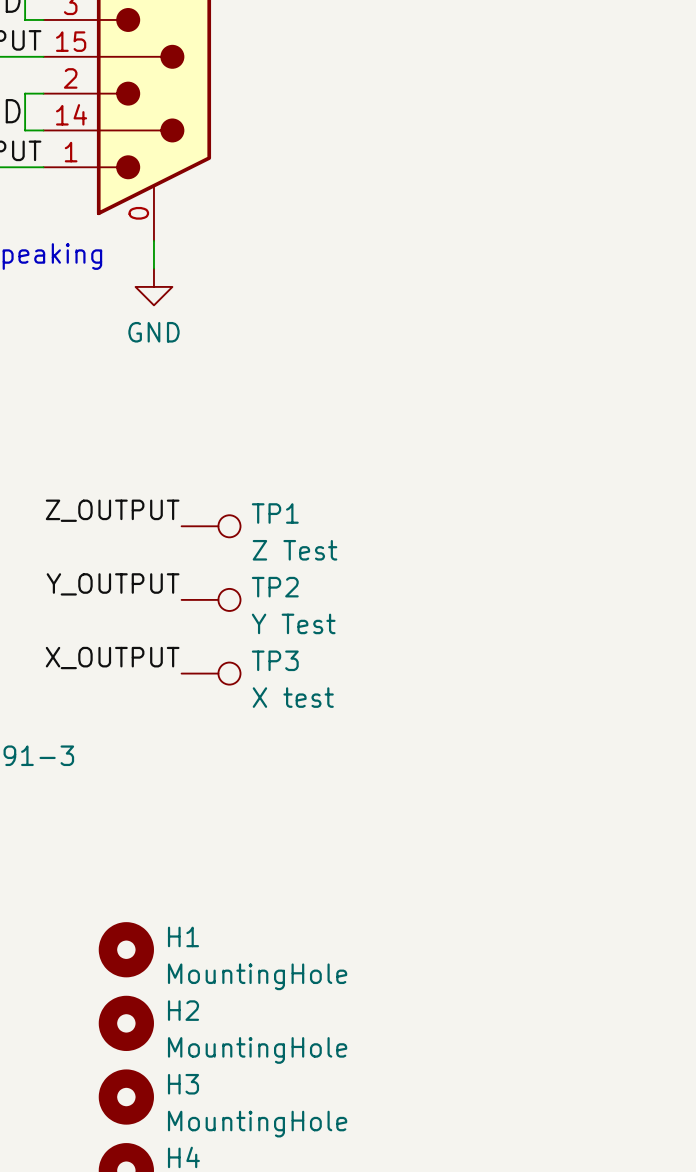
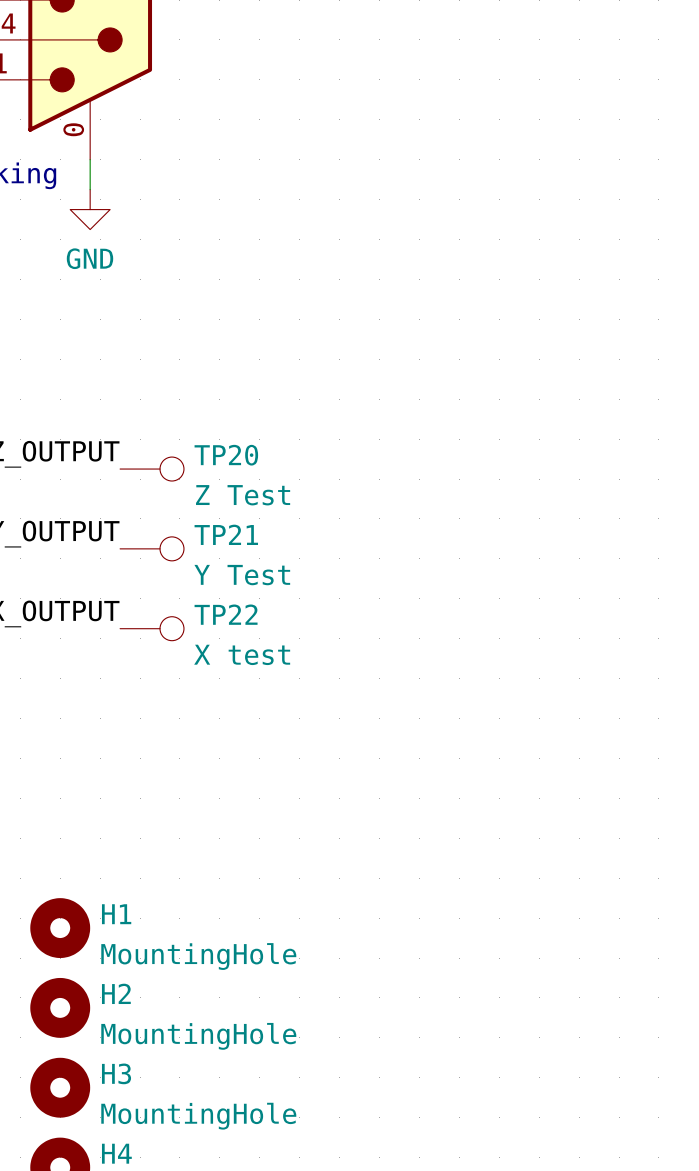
TP1 name: TP1 (275, 513) -> TP20 (226, 455)
TP2 name: TP2 (275, 587) -> TP21 (226, 534)
TP3 name: TP3 (275, 660) -> TP22 (226, 614)

